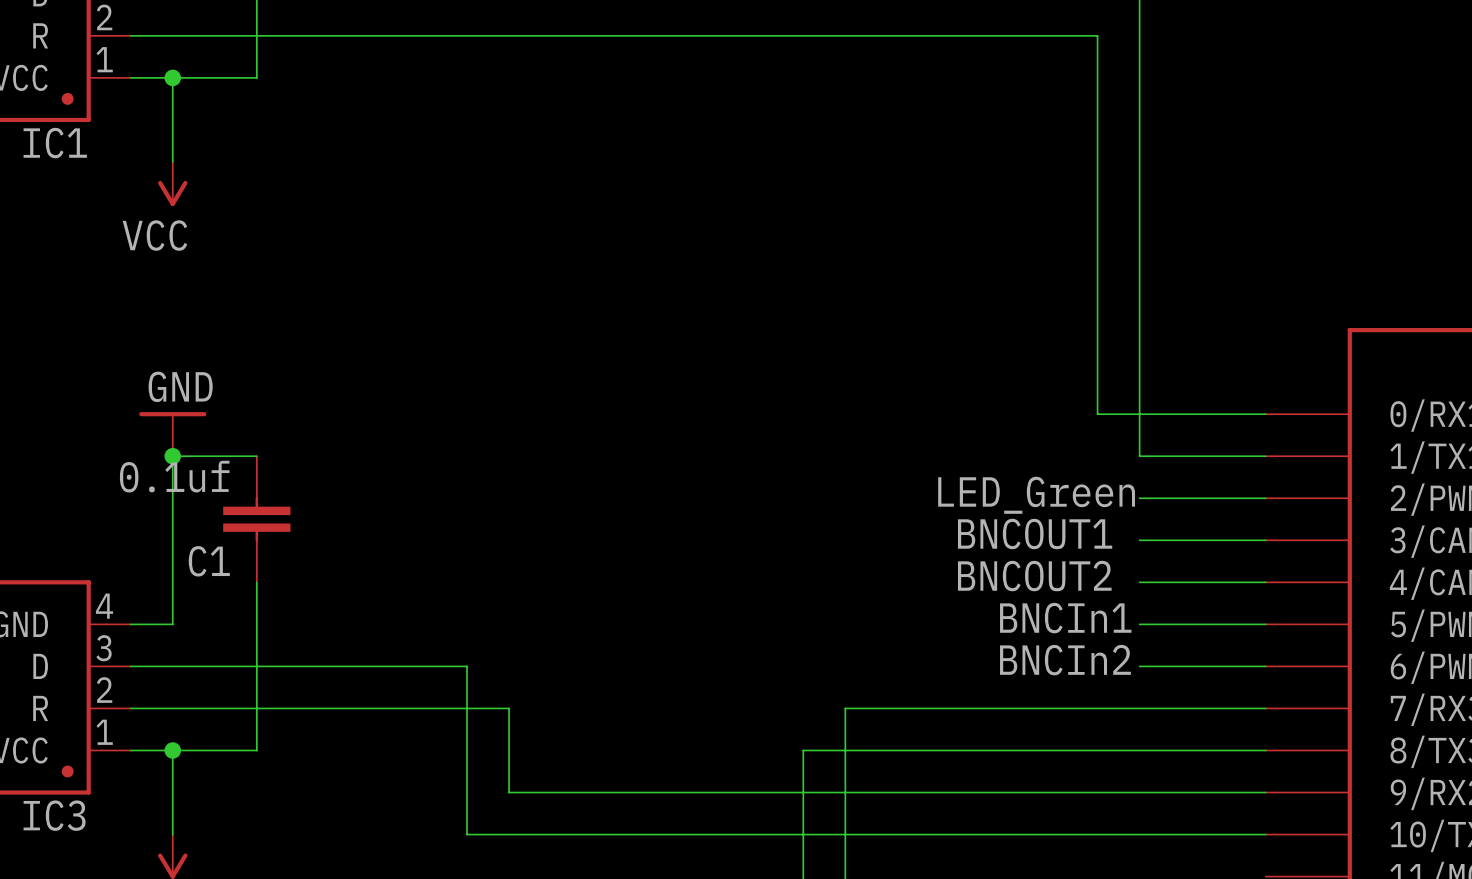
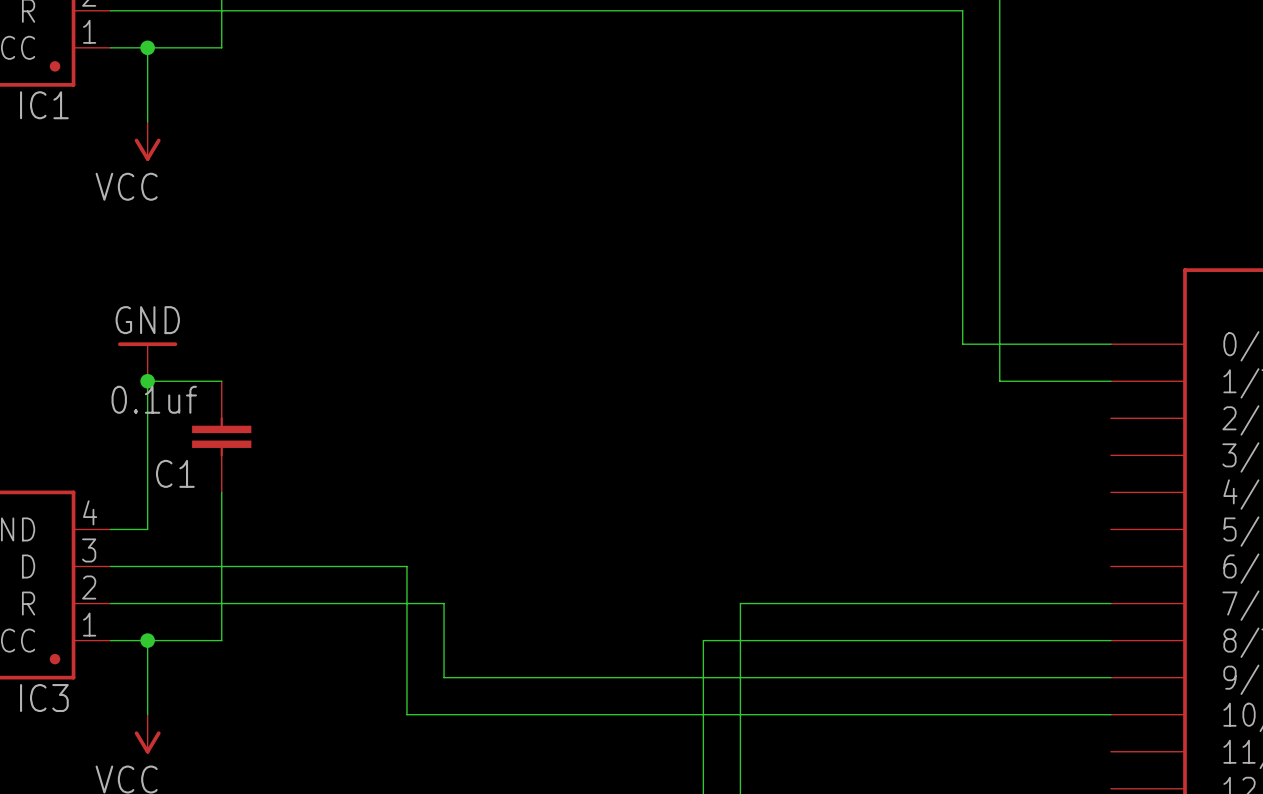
text: LED_Green (1036, 495) -> none
wire: (1139, 498) (1265, 498) -> none
text: BNCOUT1 (1035, 533) -> none
wire: (1139, 540) (1265, 540) -> none
text: BNCOUT2 (1034, 576) -> none
wire: (1139, 582) (1265, 582) -> none
text: BNCIn1 (1065, 618) -> none
wire: (1139, 624) (1265, 624) -> none
text: BNCIn2 (1065, 660) -> none
wire: (1139, 666) (1265, 666) -> none

